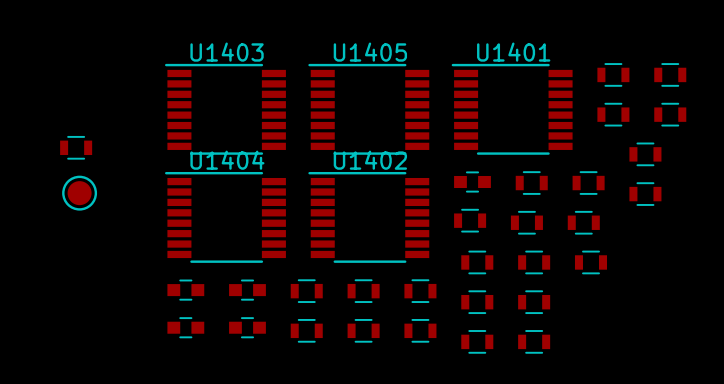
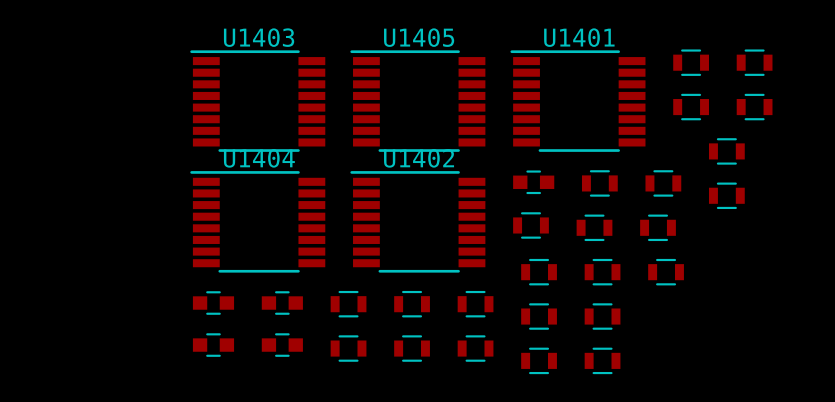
part: (76, 147) -> none
part: (79, 193) -> none

